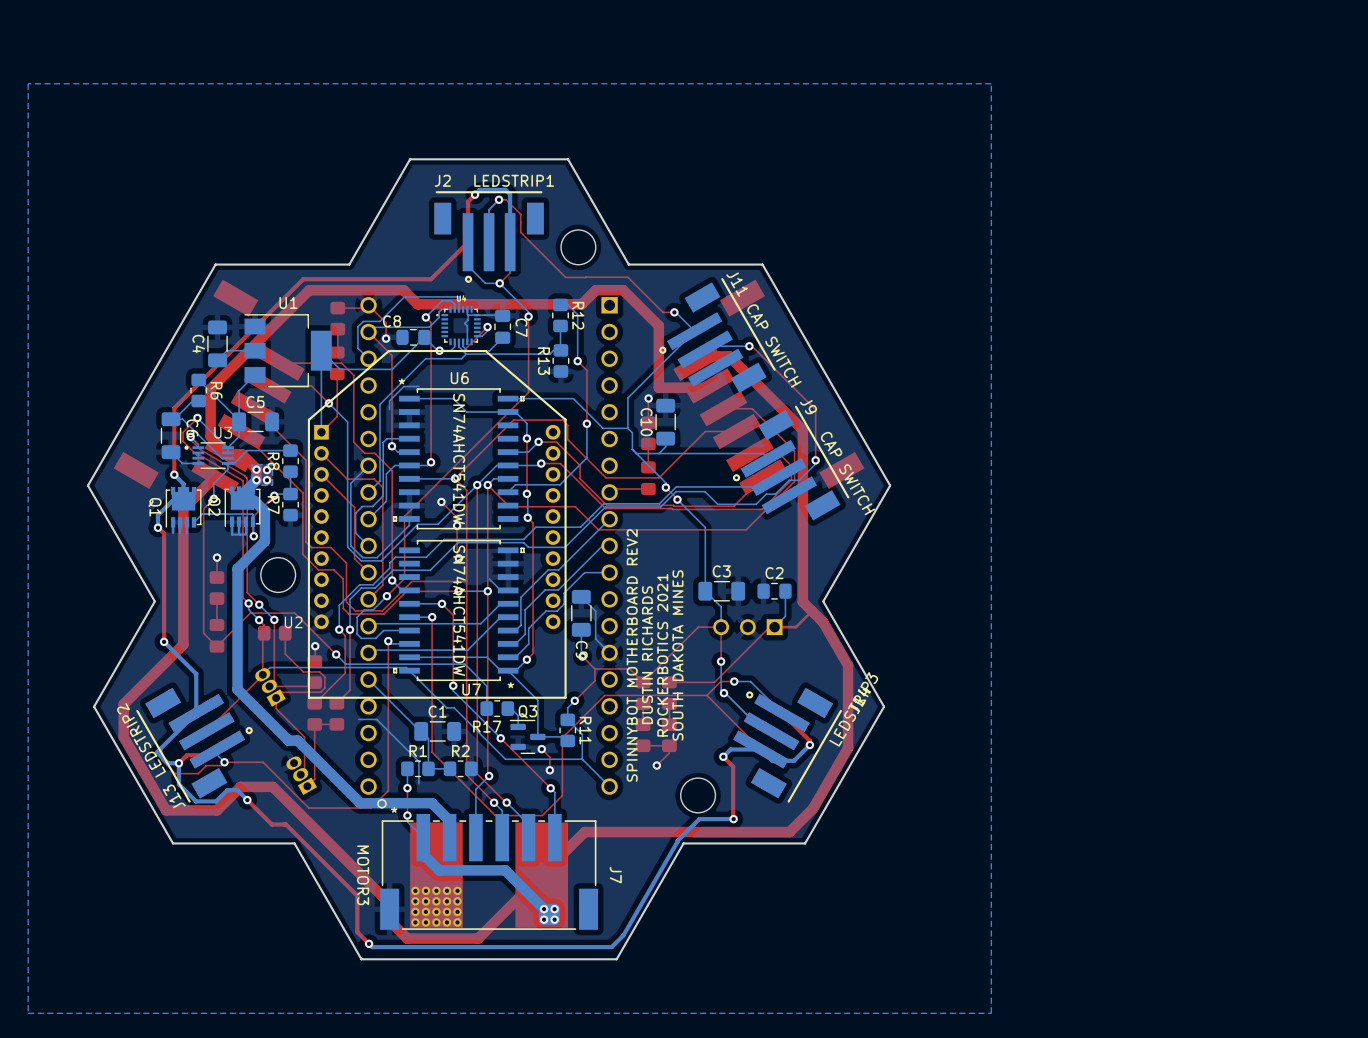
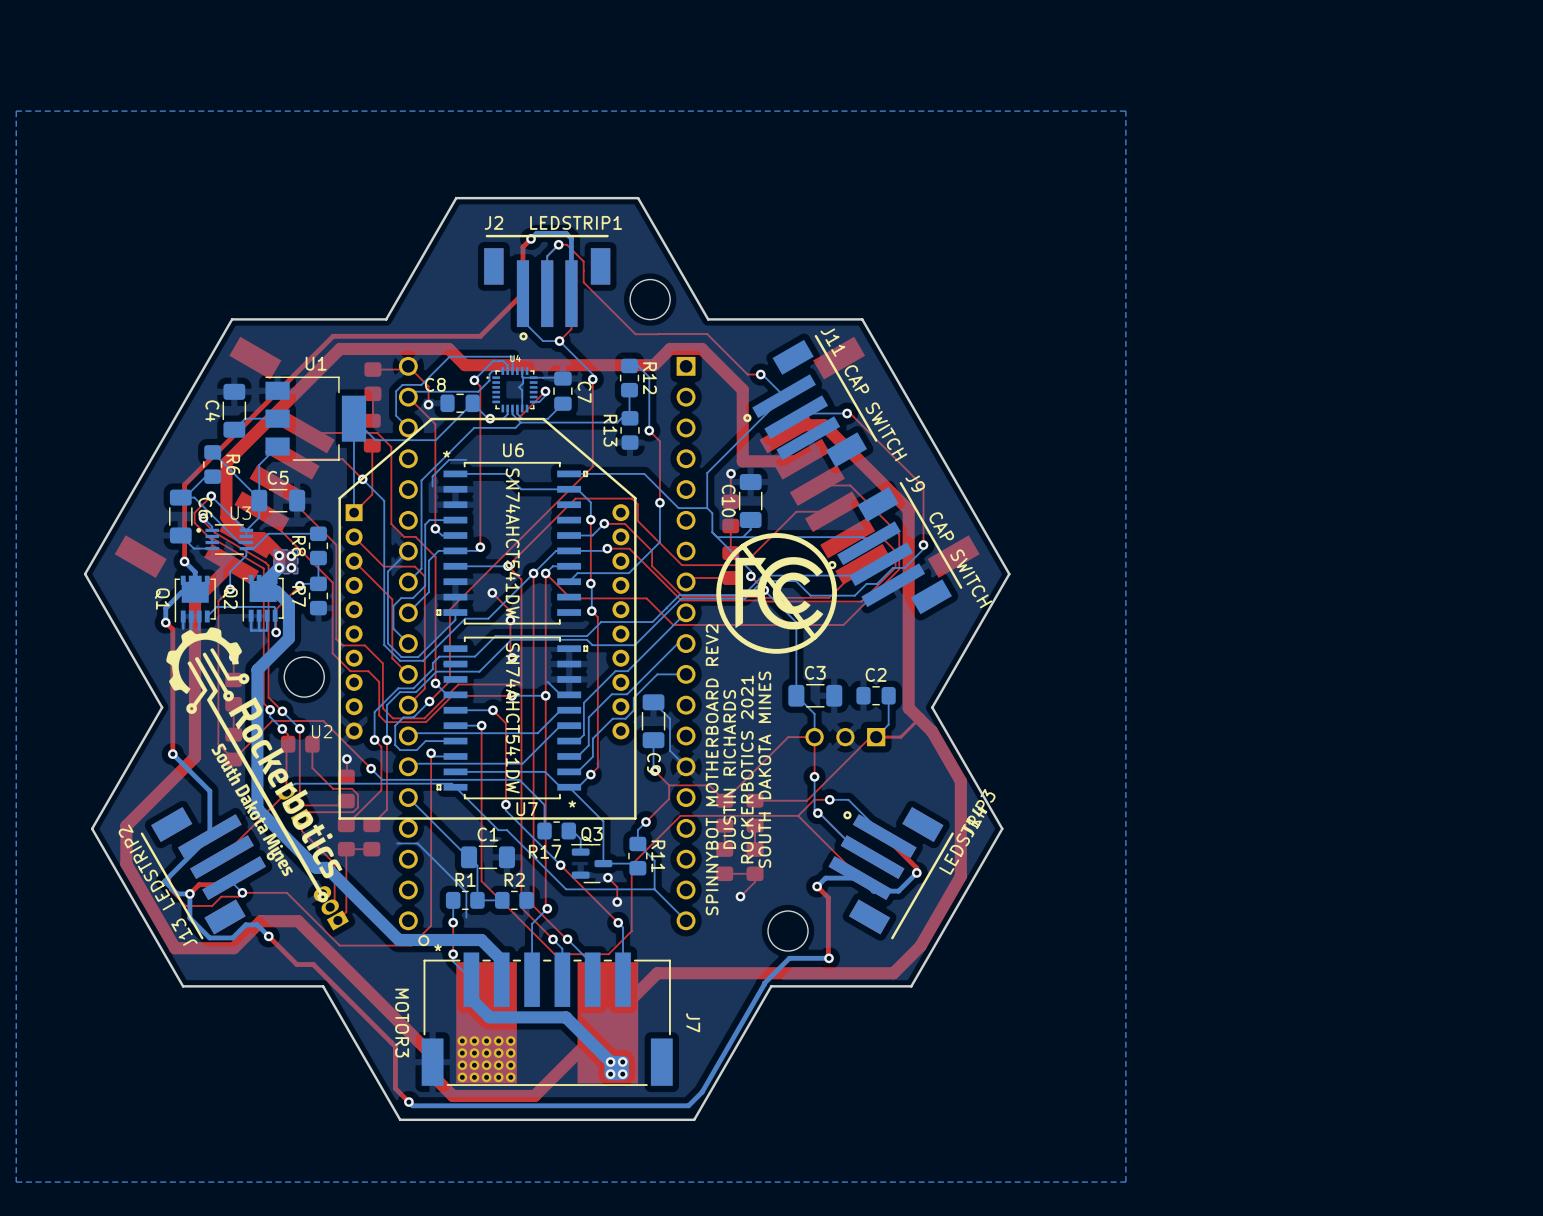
drawing: none -> [716, 533, 837, 654]
drawing: none -> [166, 627, 343, 903]

